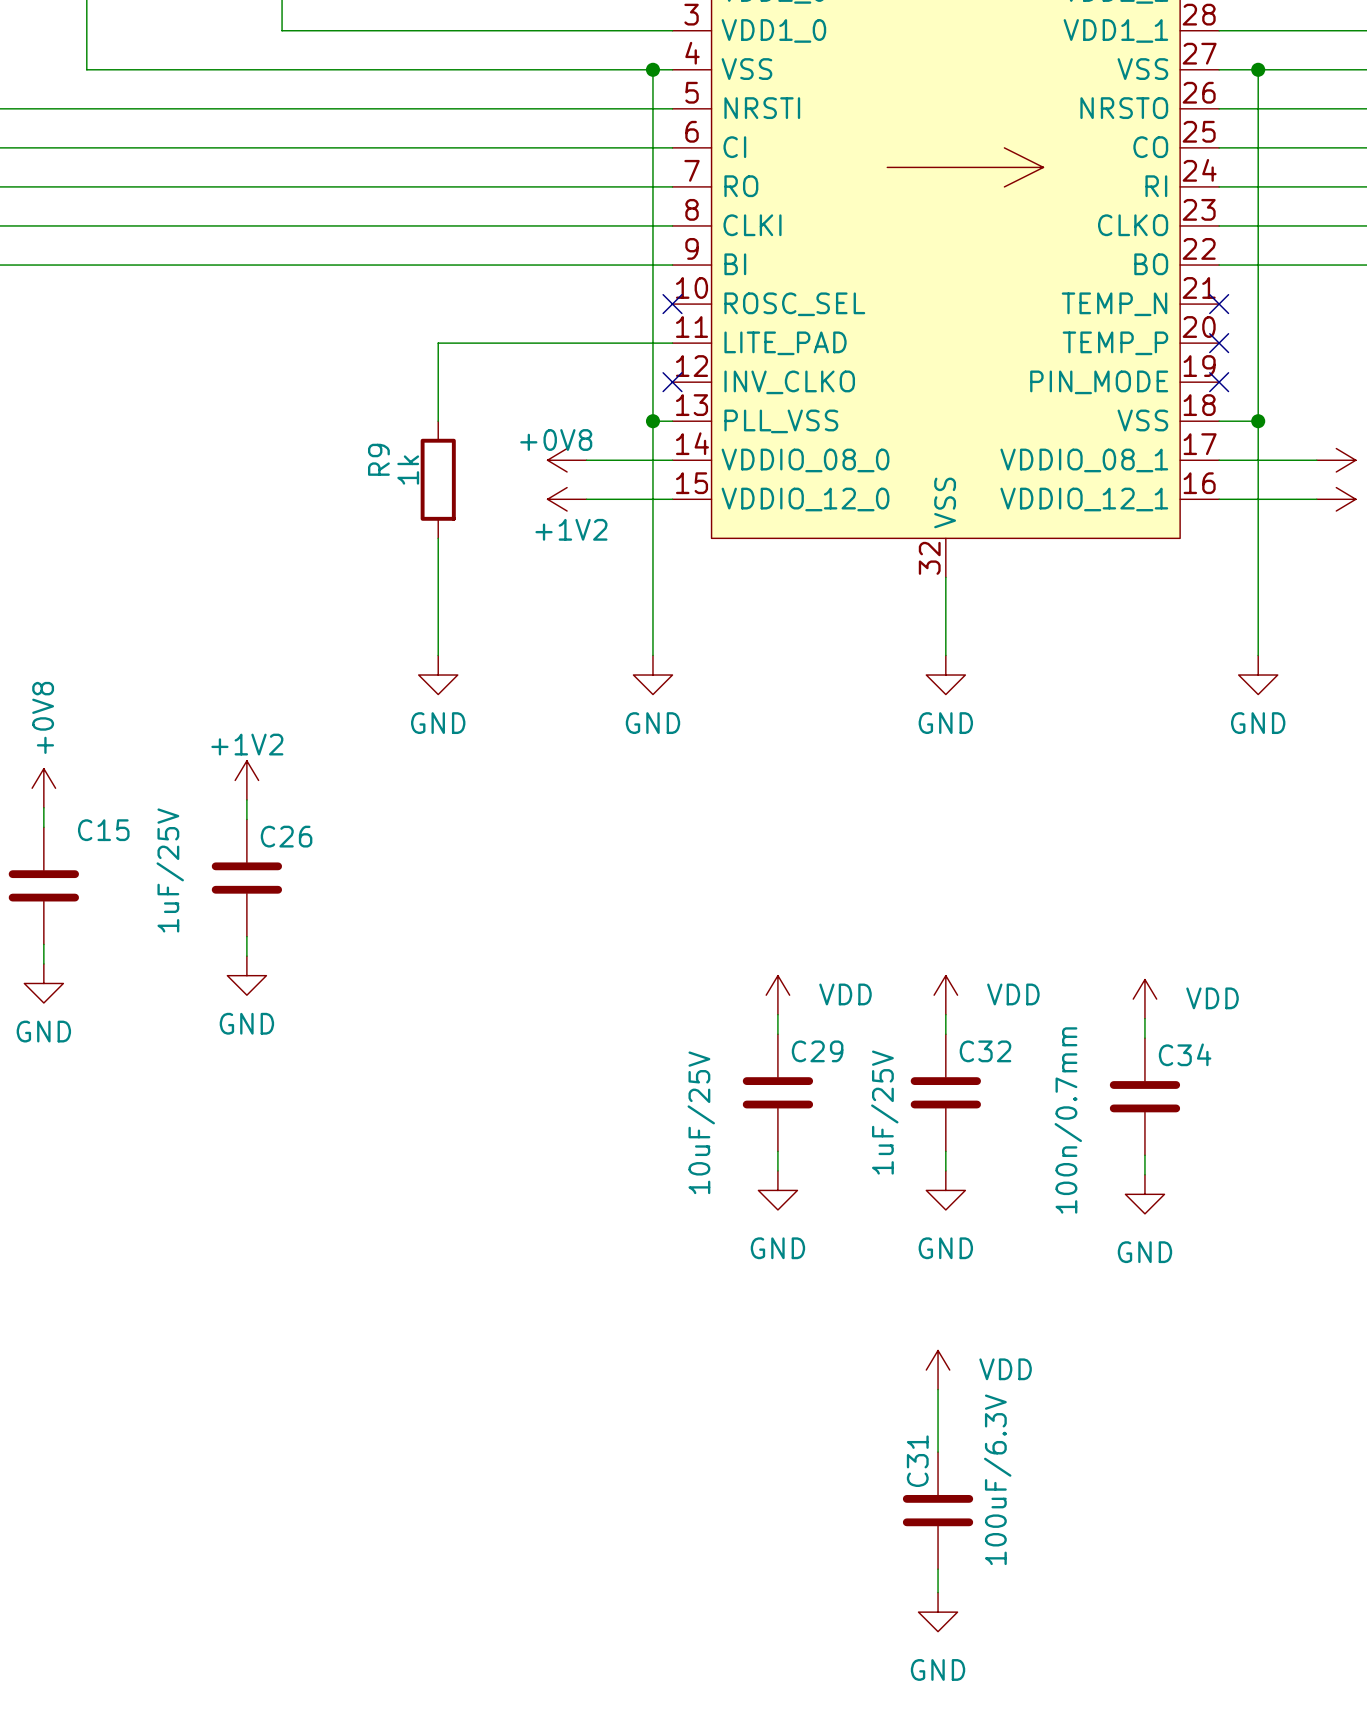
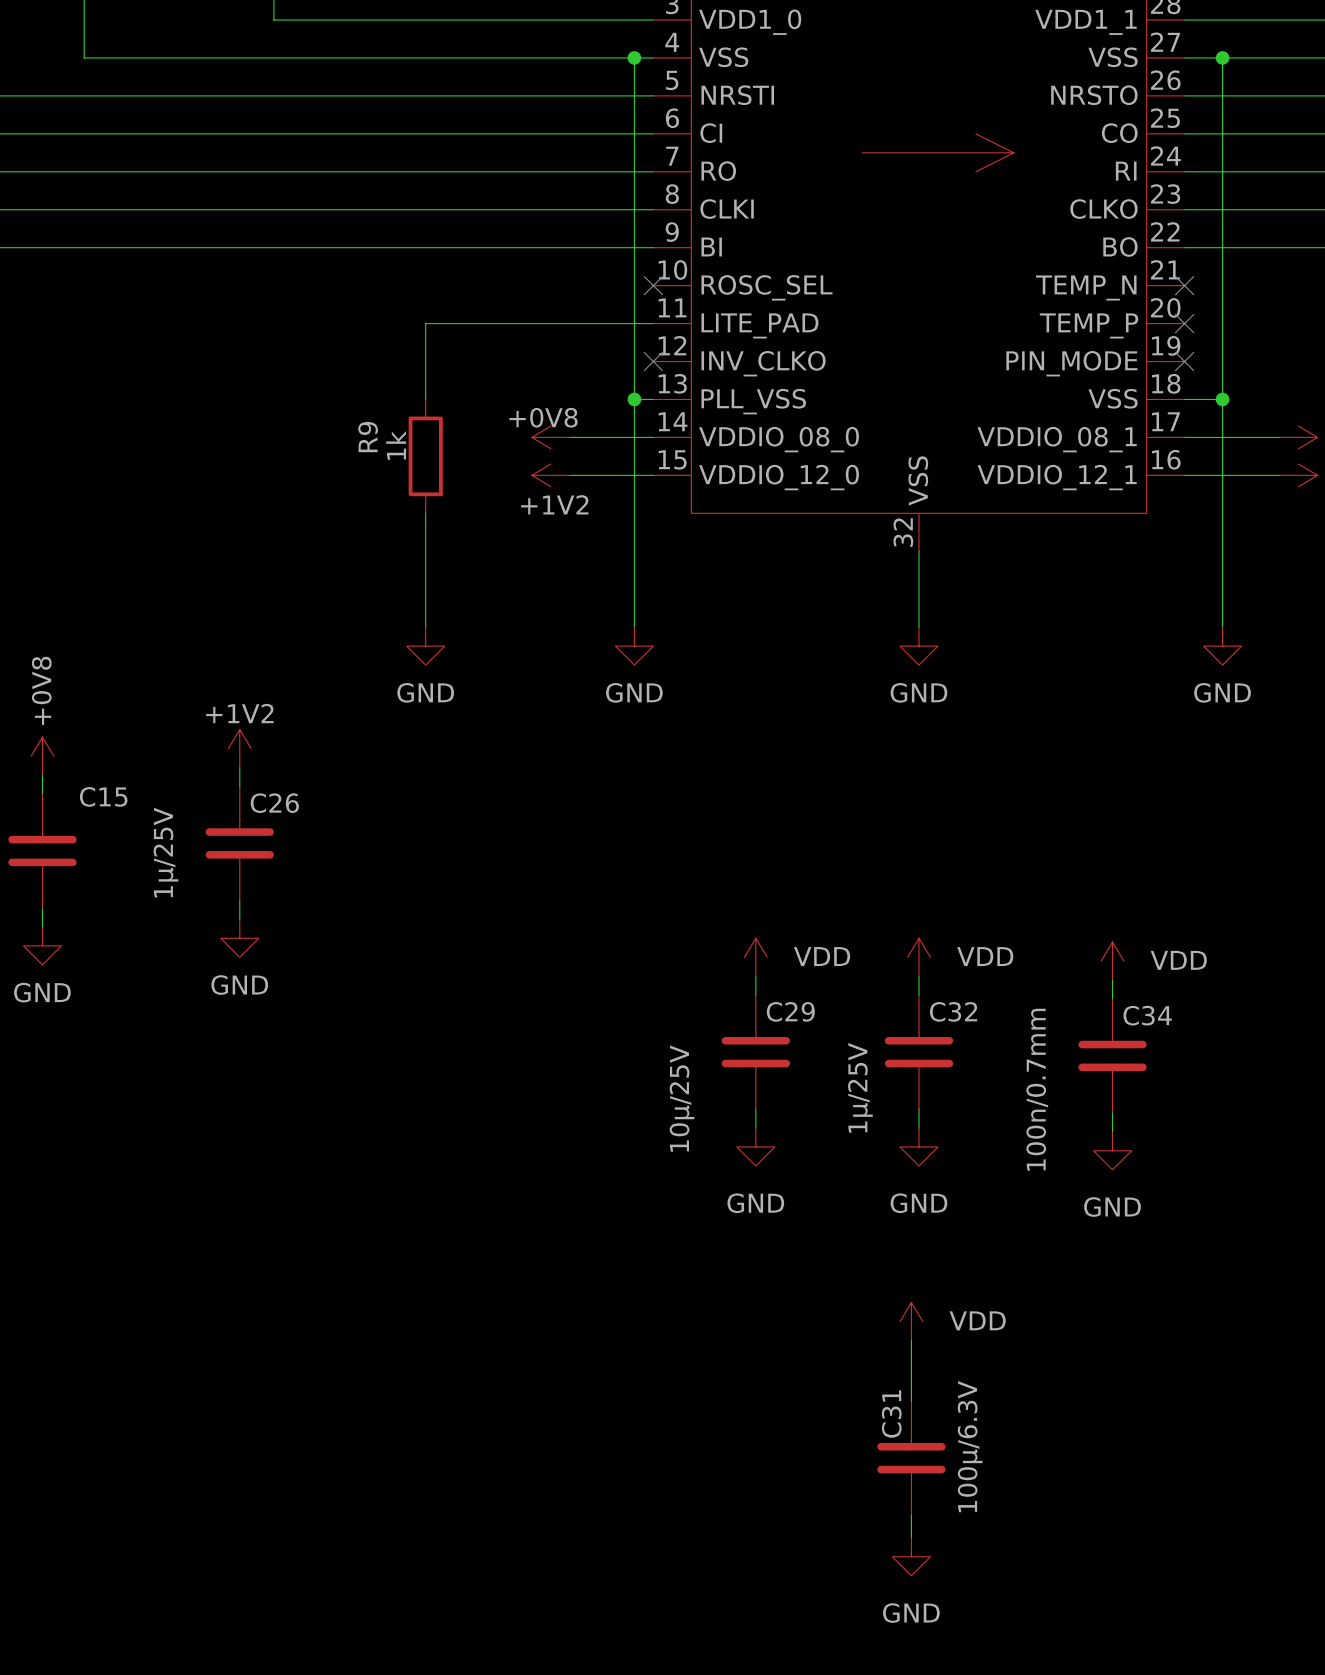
C26 value: 1uF/25V (170, 870) -> 1µ/25V (165, 852)
C32 value: 1uF/25V (884, 1112) -> 1µ/25V (860, 1087)
C29 value: 10uF/25V (701, 1122) -> 10µ/25V (682, 1098)
C31 value: 100uF/6.3V (997, 1479) -> 100µ/6.3V (970, 1446)

